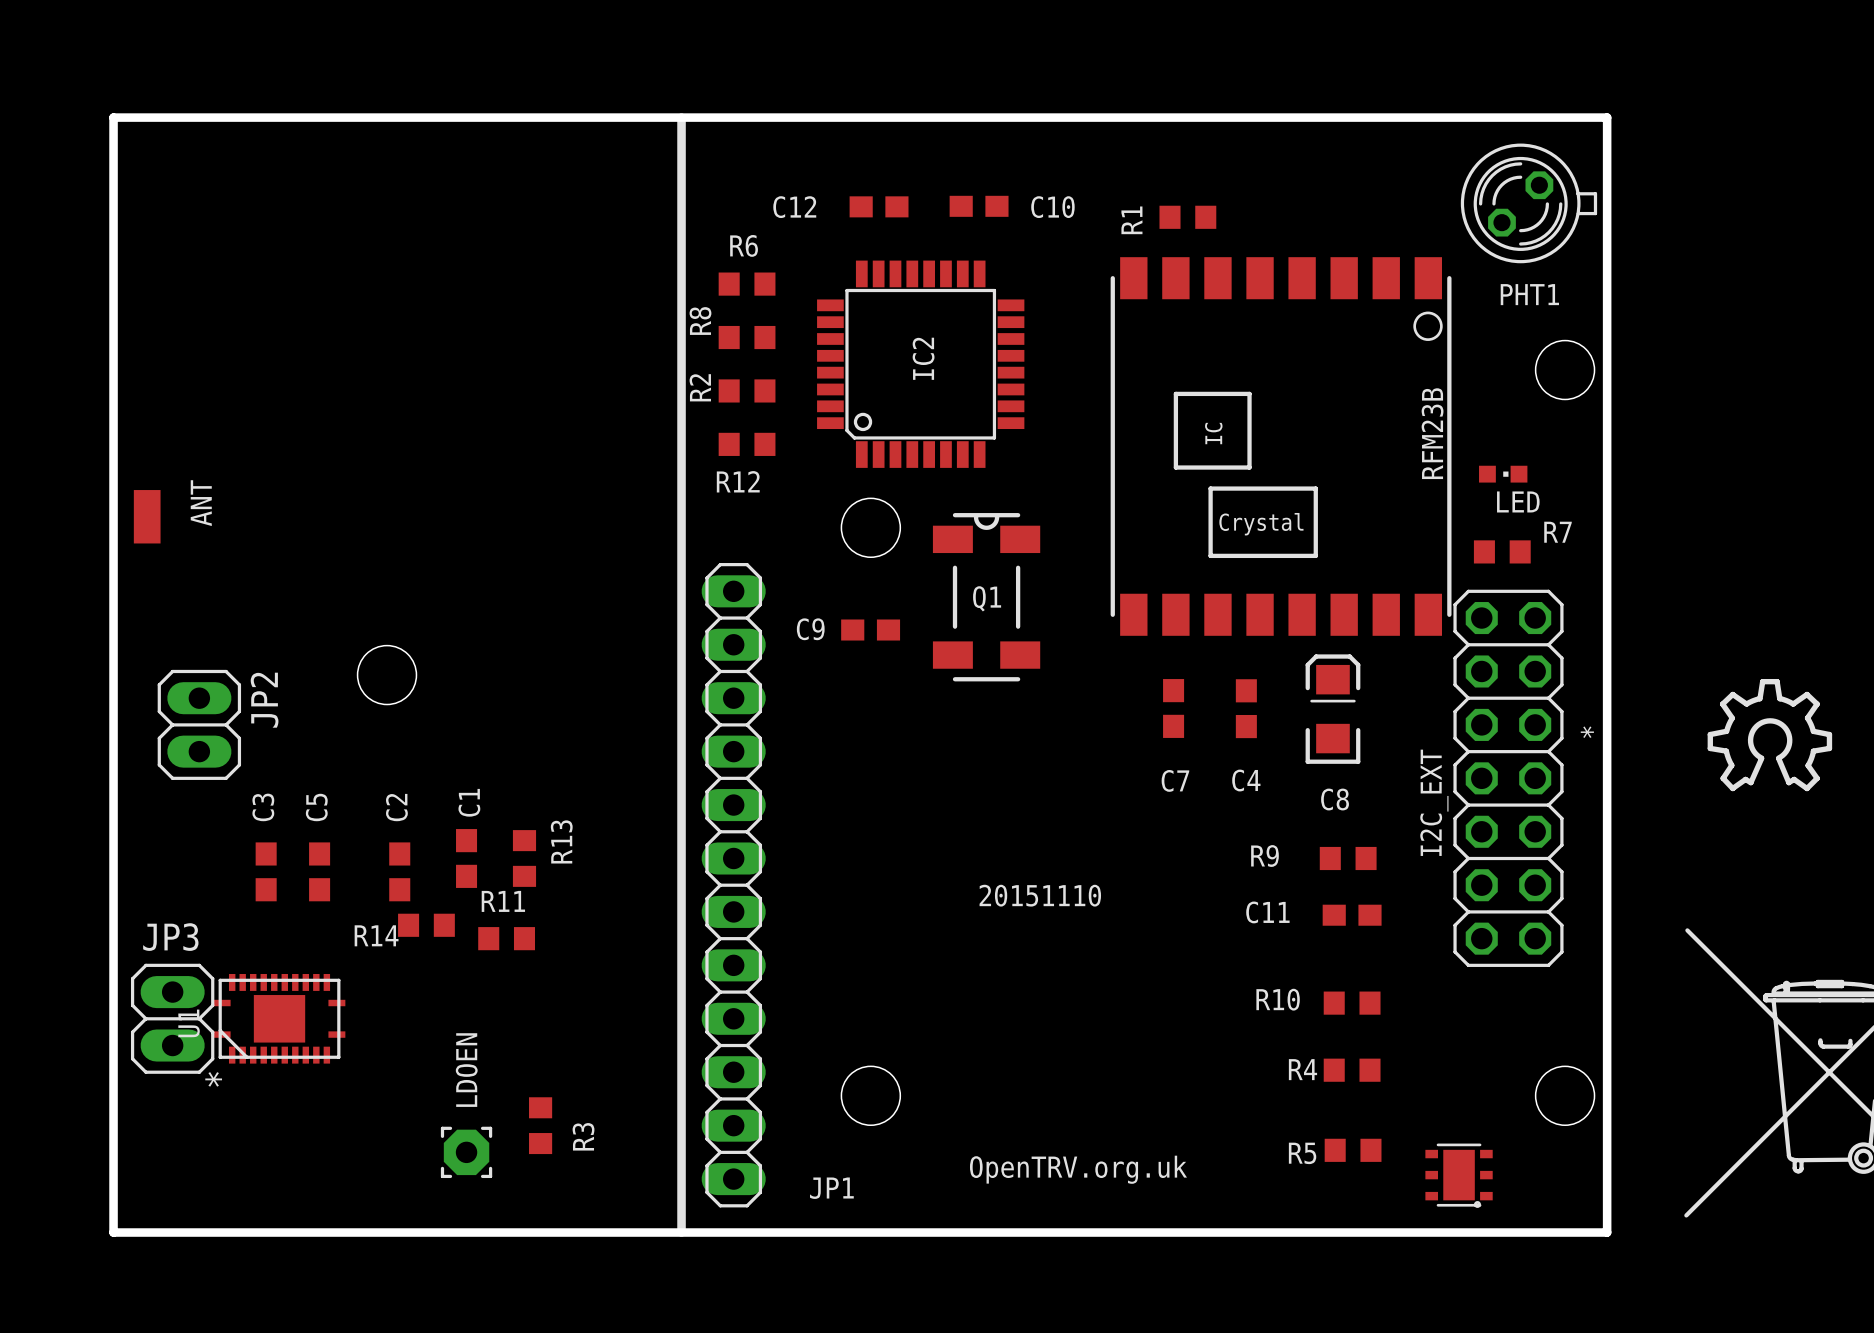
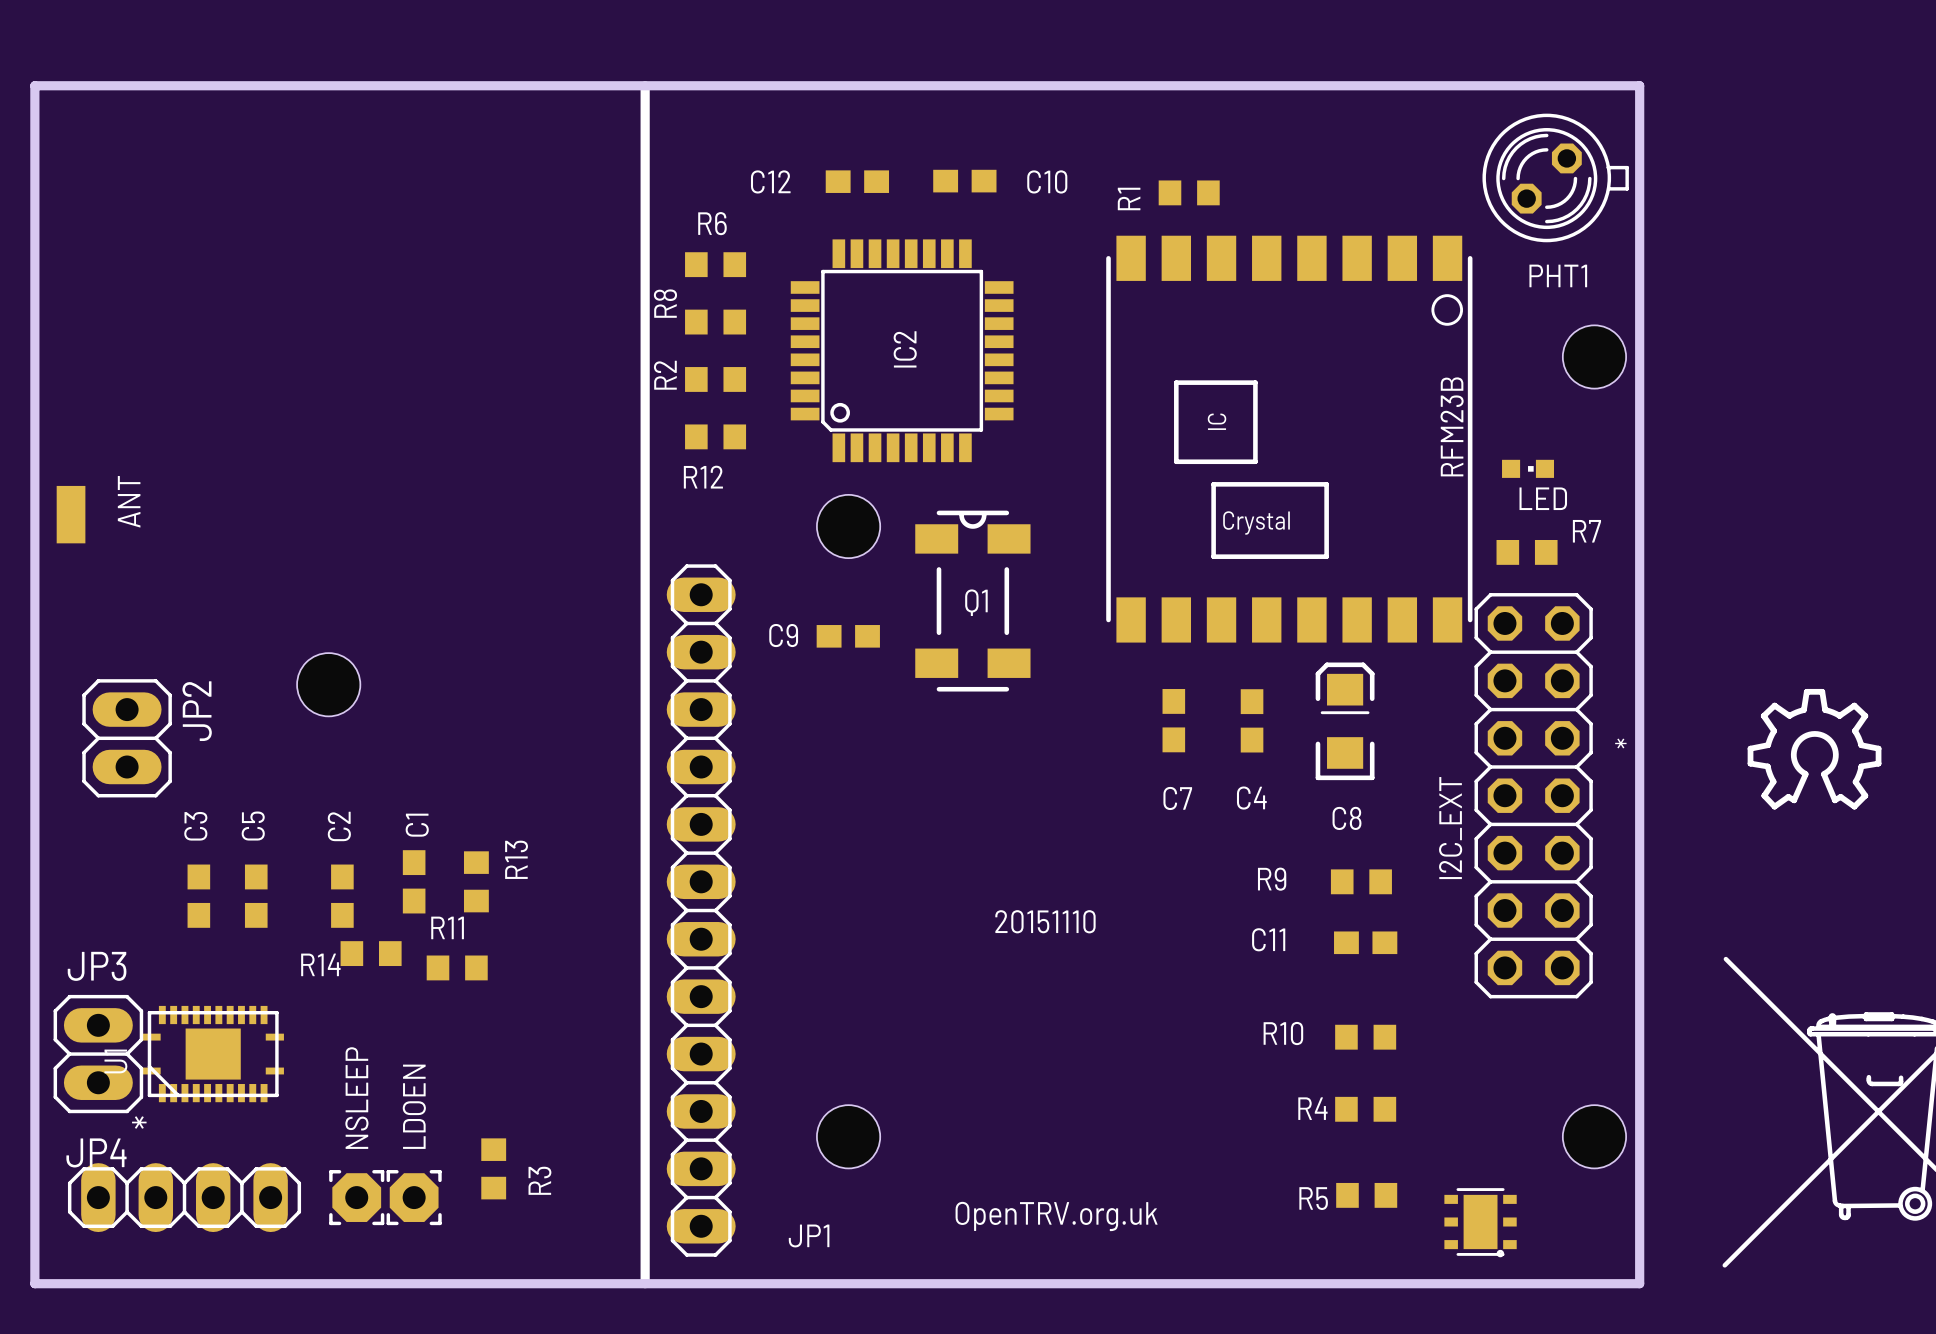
JP4: none -> (184, 1197)
NSLEEP: none -> (356, 1197)

